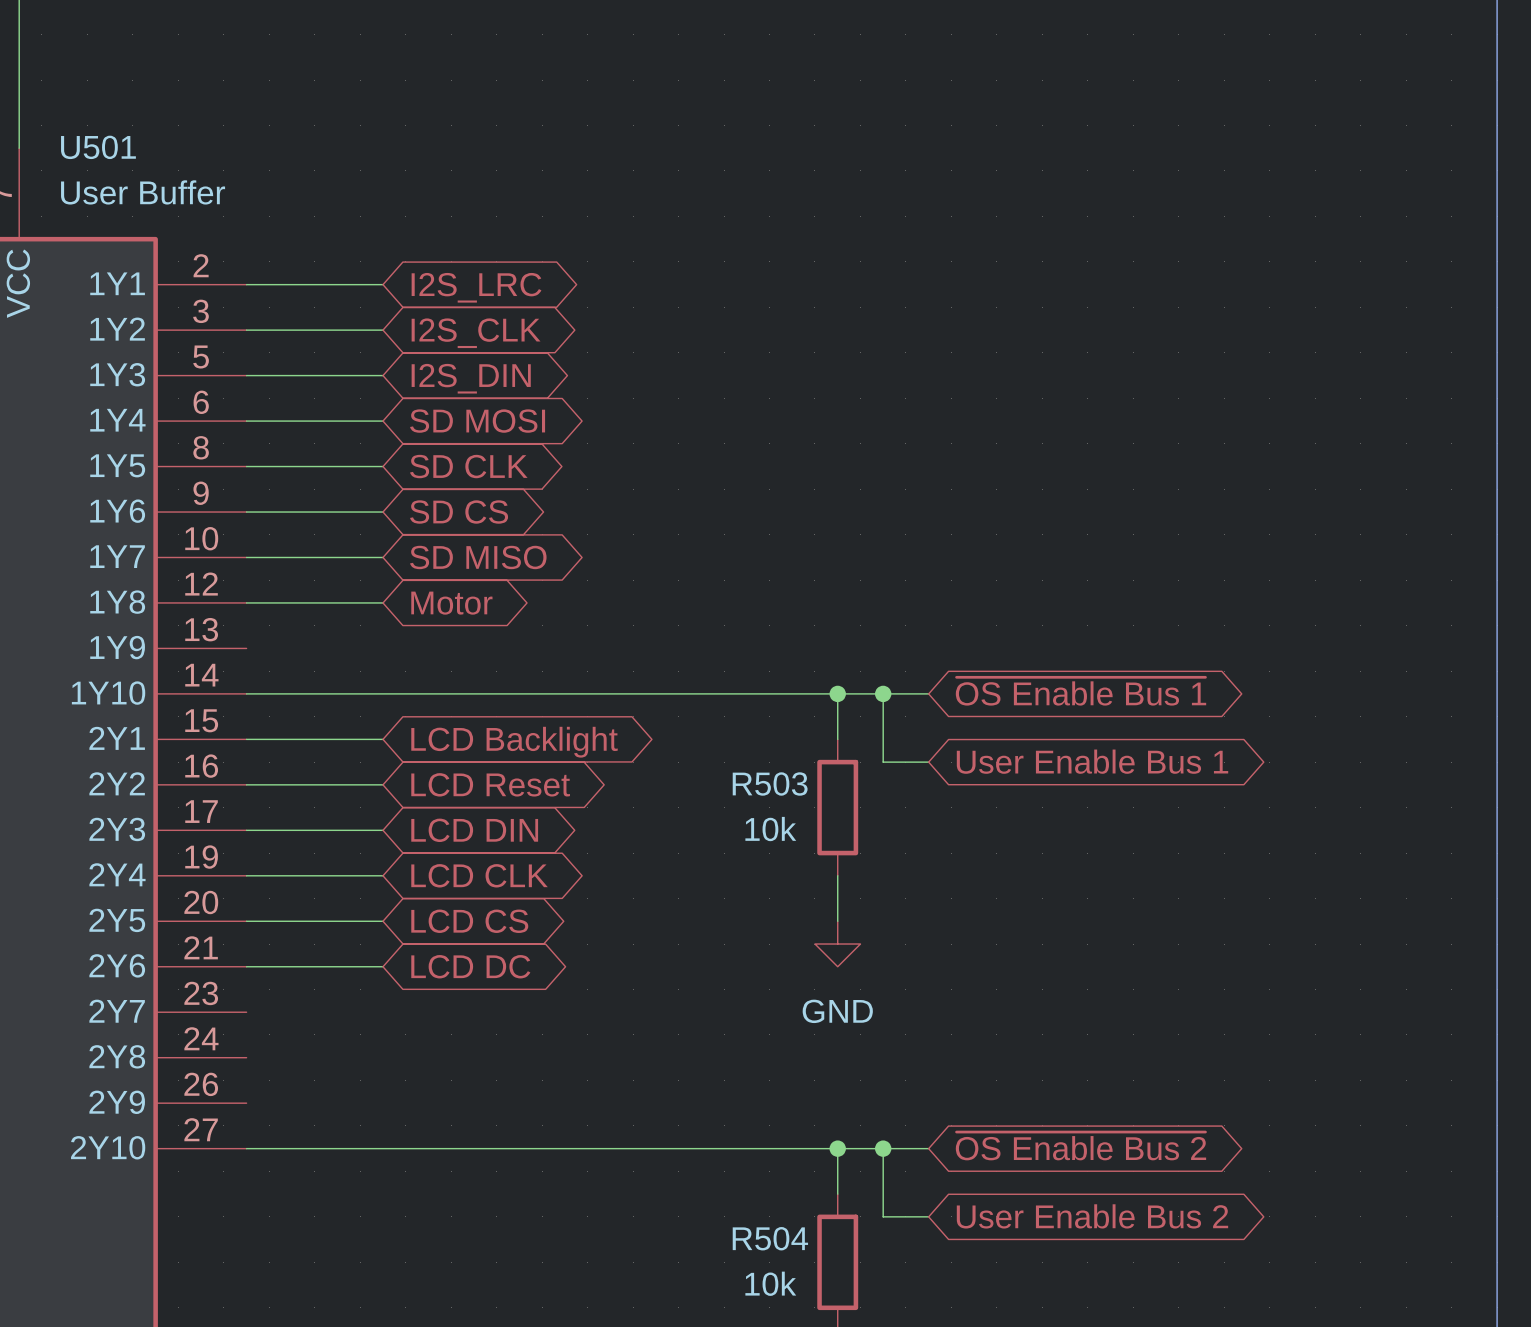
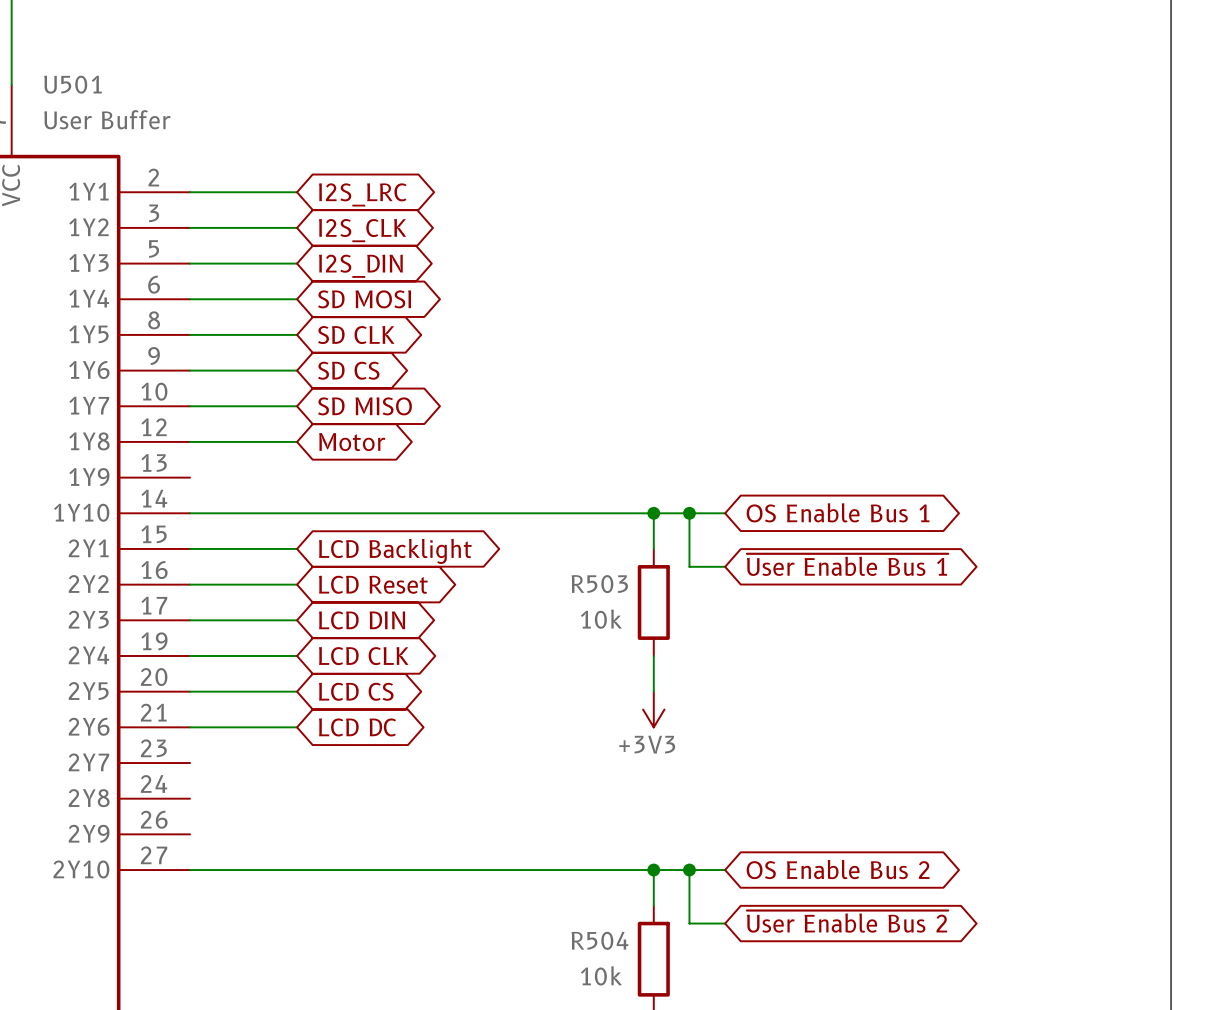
global label: ~{OS Enable Bus 1} (1080, 691) -> OS Enable Bus 1 (838, 512)
global label: User Enable Bus 1 (1092, 761) -> ~{User Enable Bus 1} (847, 564)
power symbol: GND (837, 944) -> +3V3 (653, 709)
global label: ~{OS Enable Bus 2} (1080, 1146) -> OS Enable Bus 2 (838, 869)
global label: User Enable Bus 2 (1092, 1216) -> ~{User Enable Bus 2} (847, 921)

